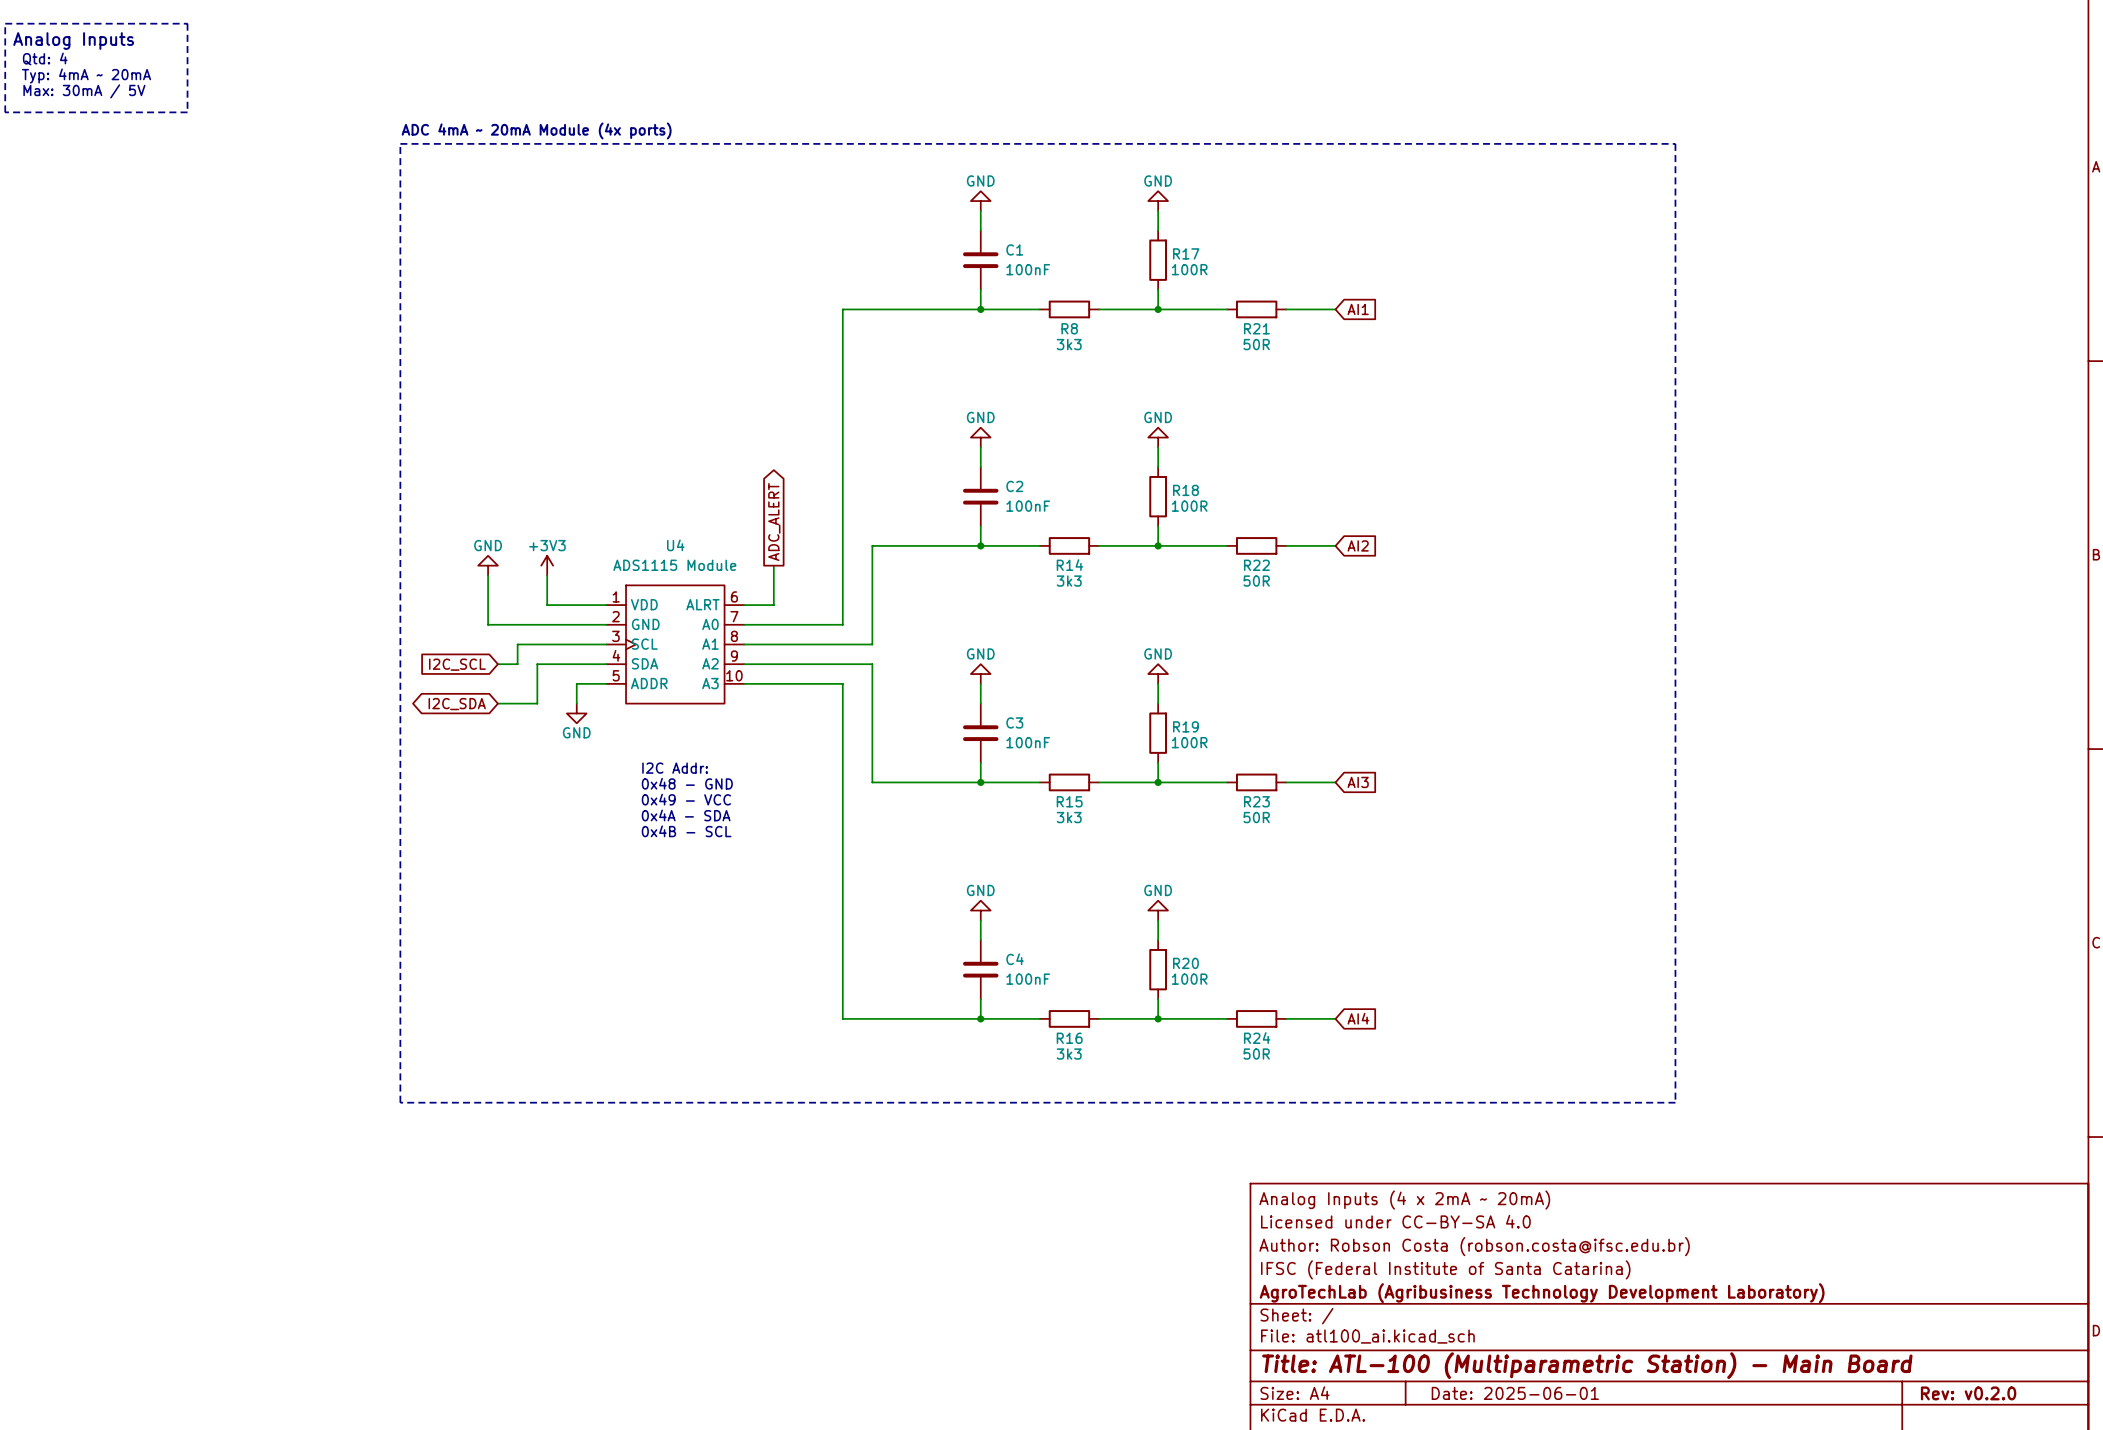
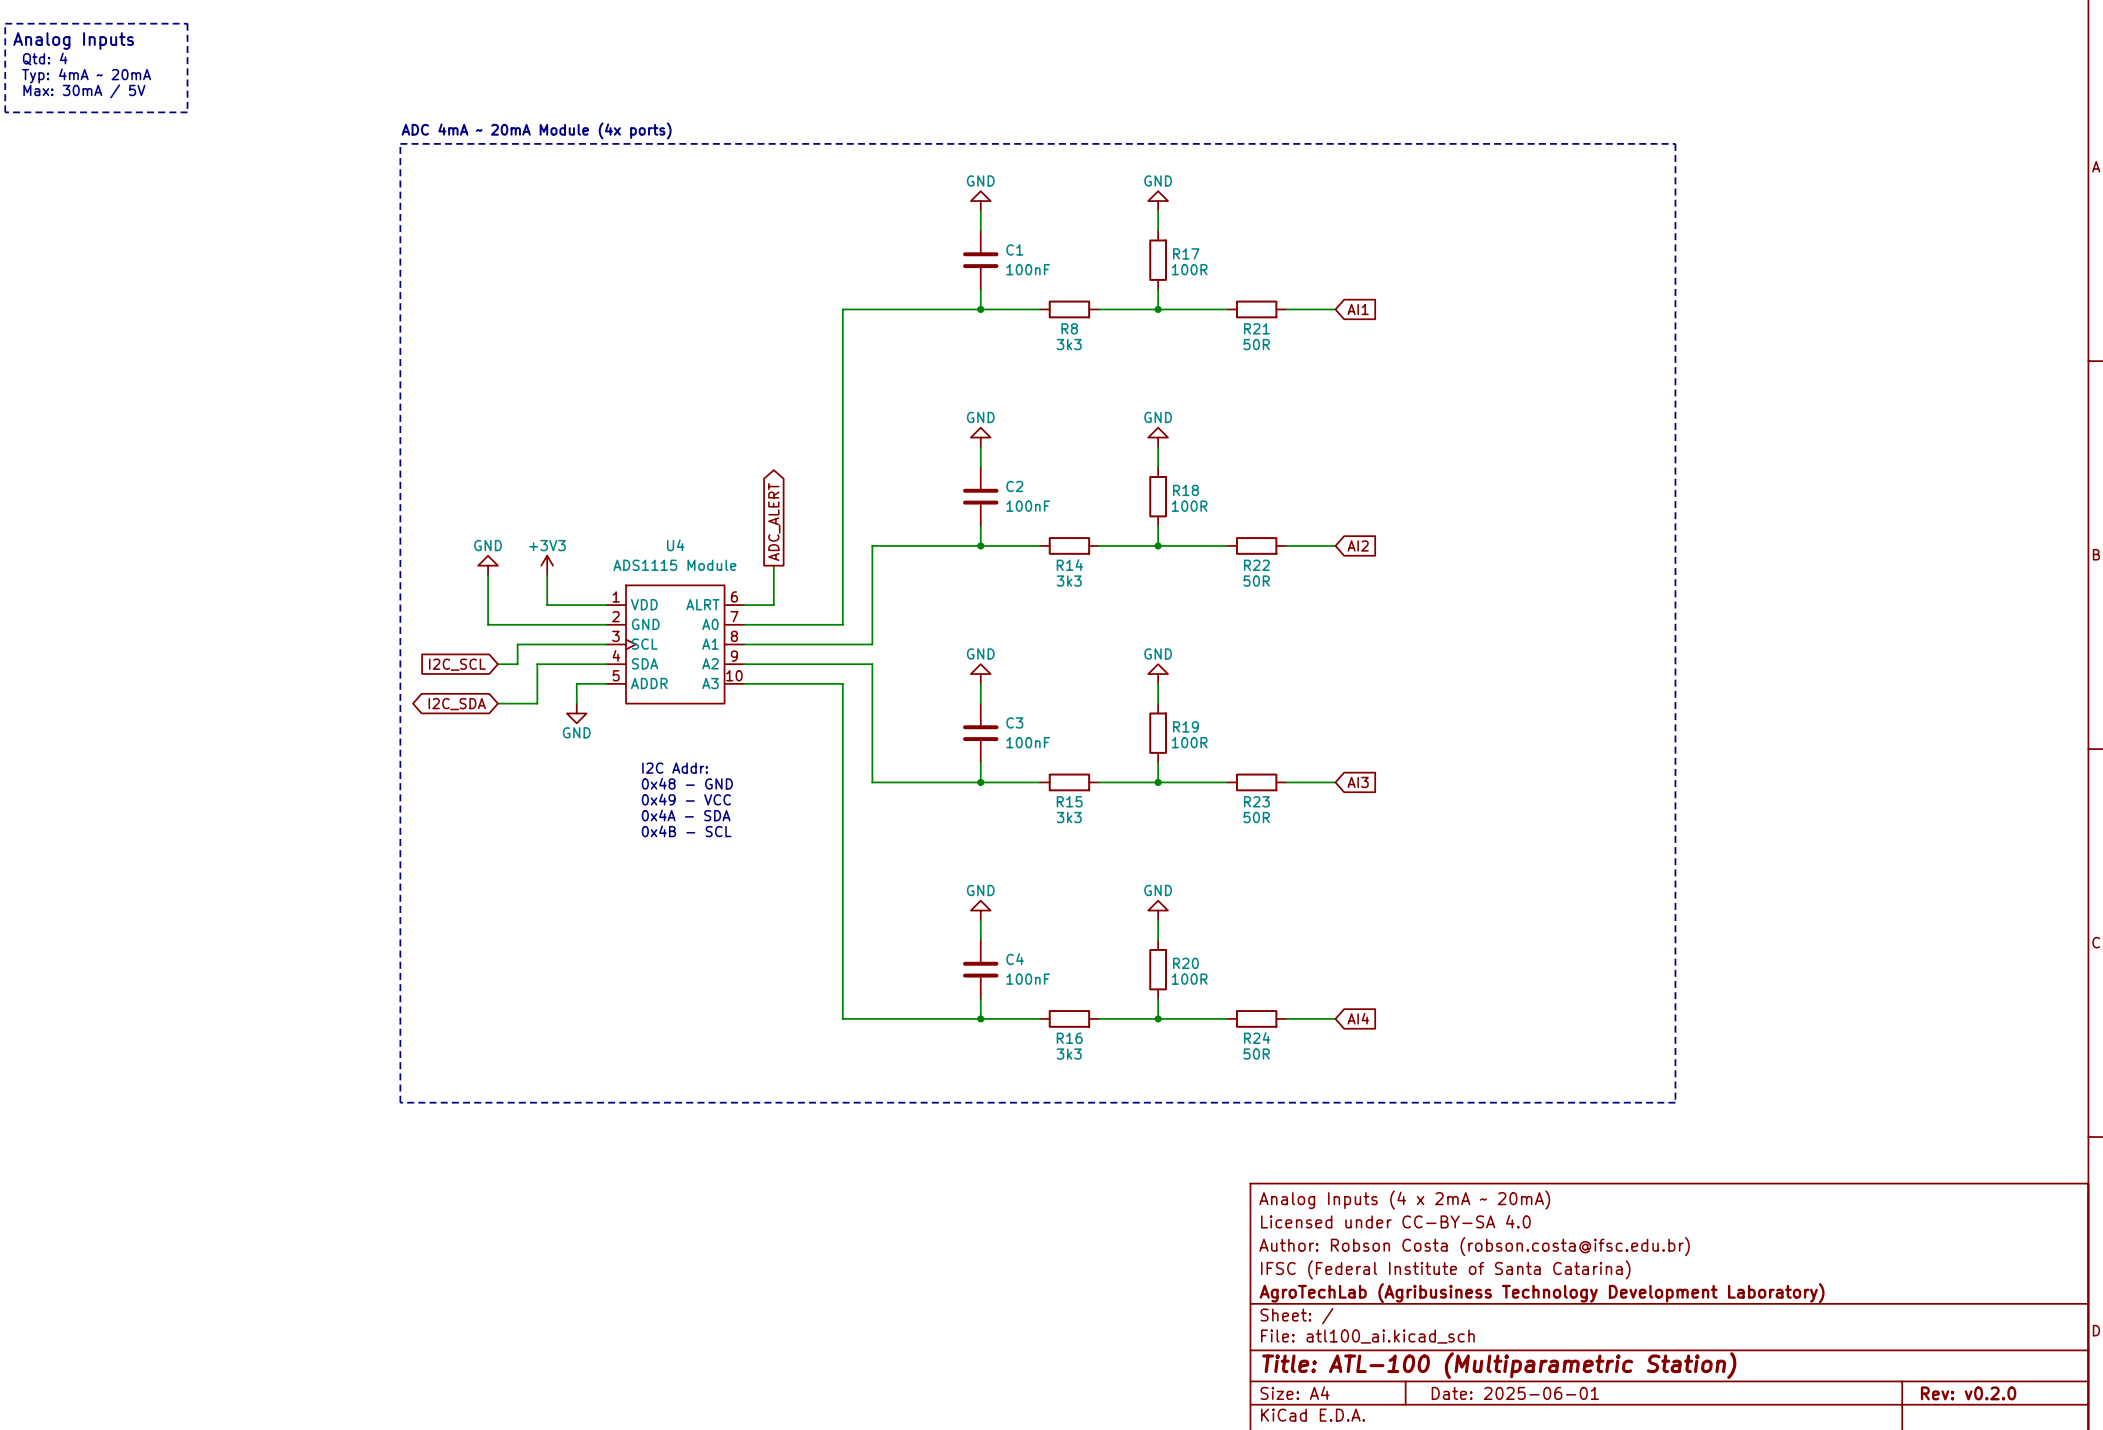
title block: Title: ATL-100 (Multiparametric Station) - Main Board (1587, 1365) -> Title: ATL-100 (Multiparametric Station) (1499, 1365)

